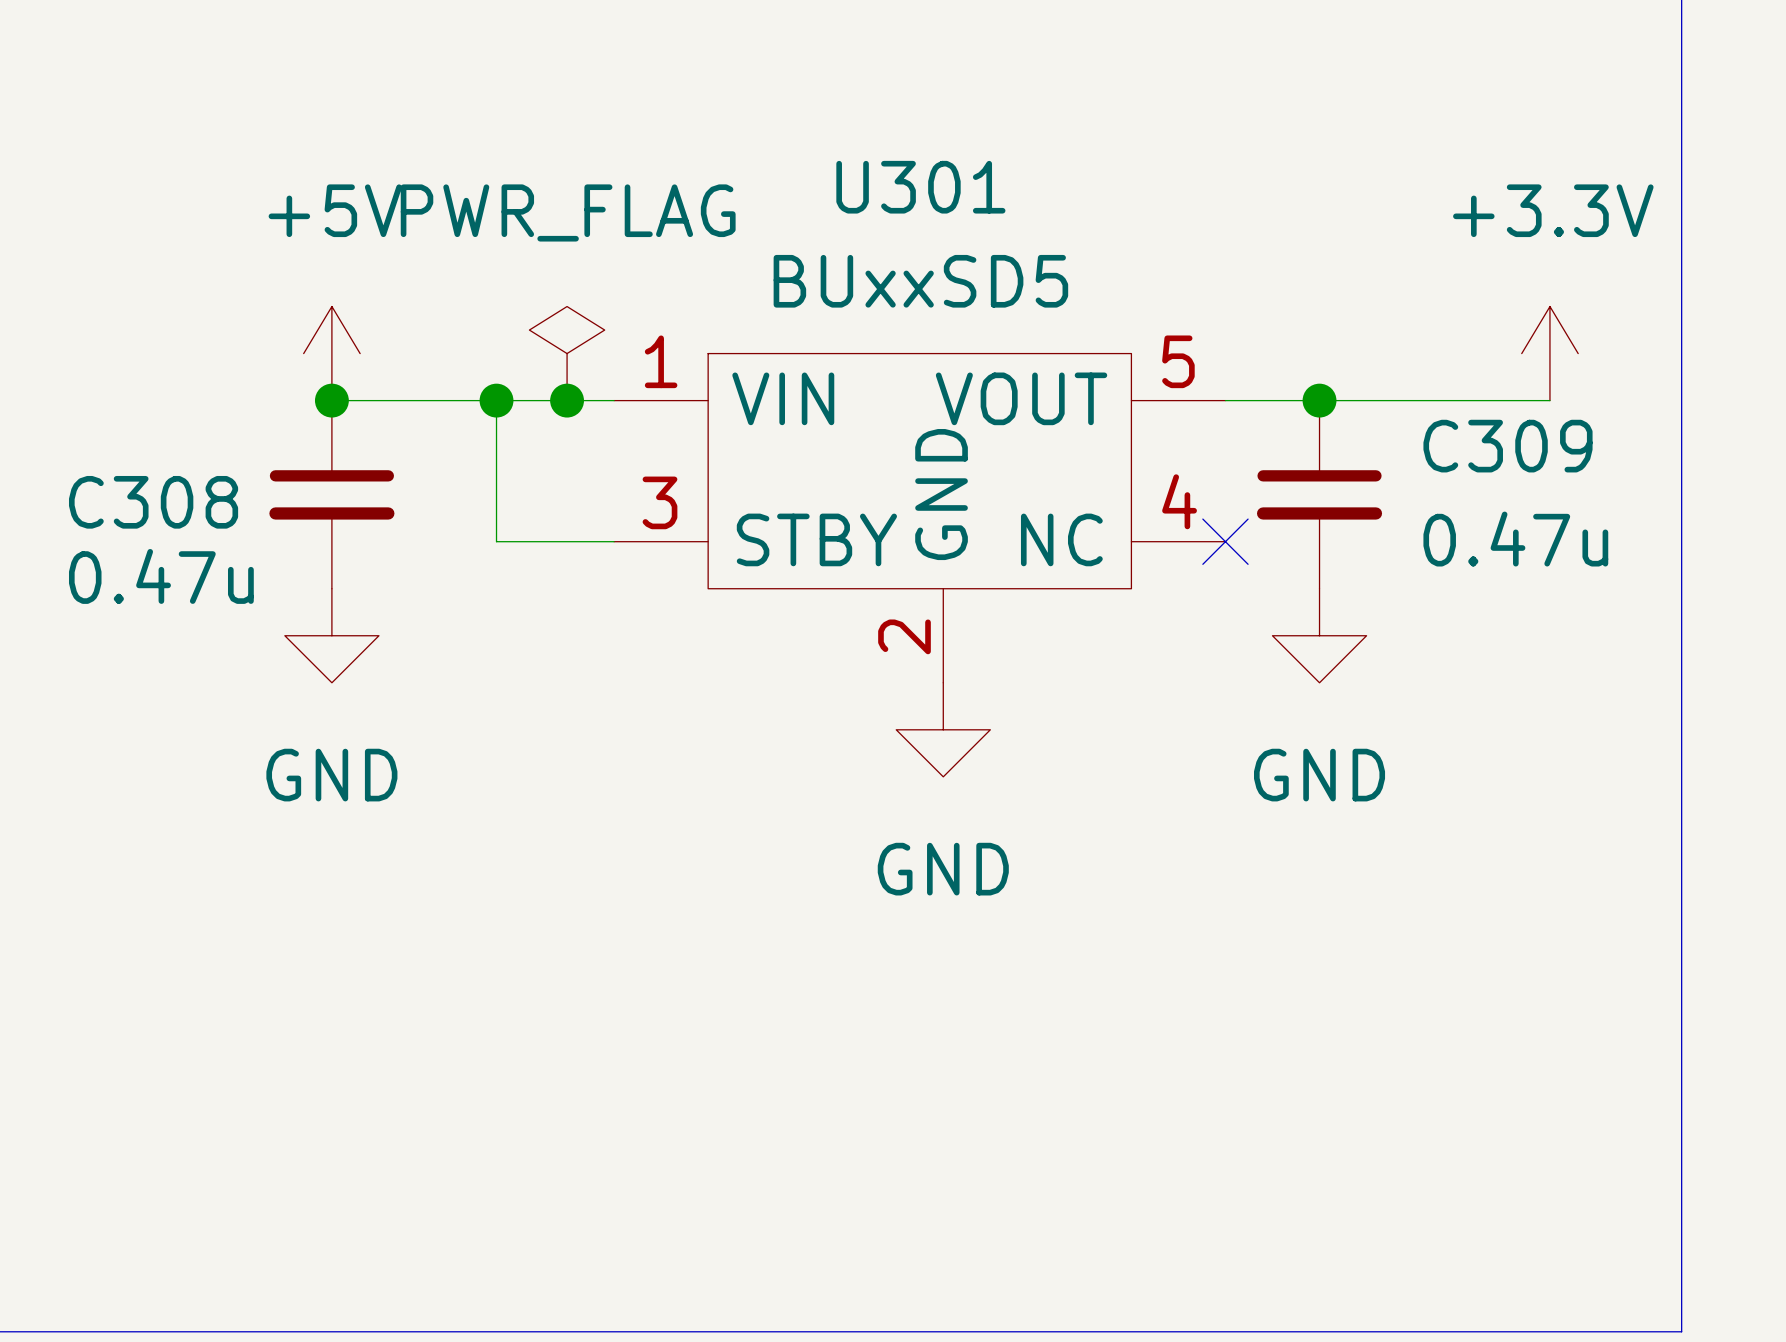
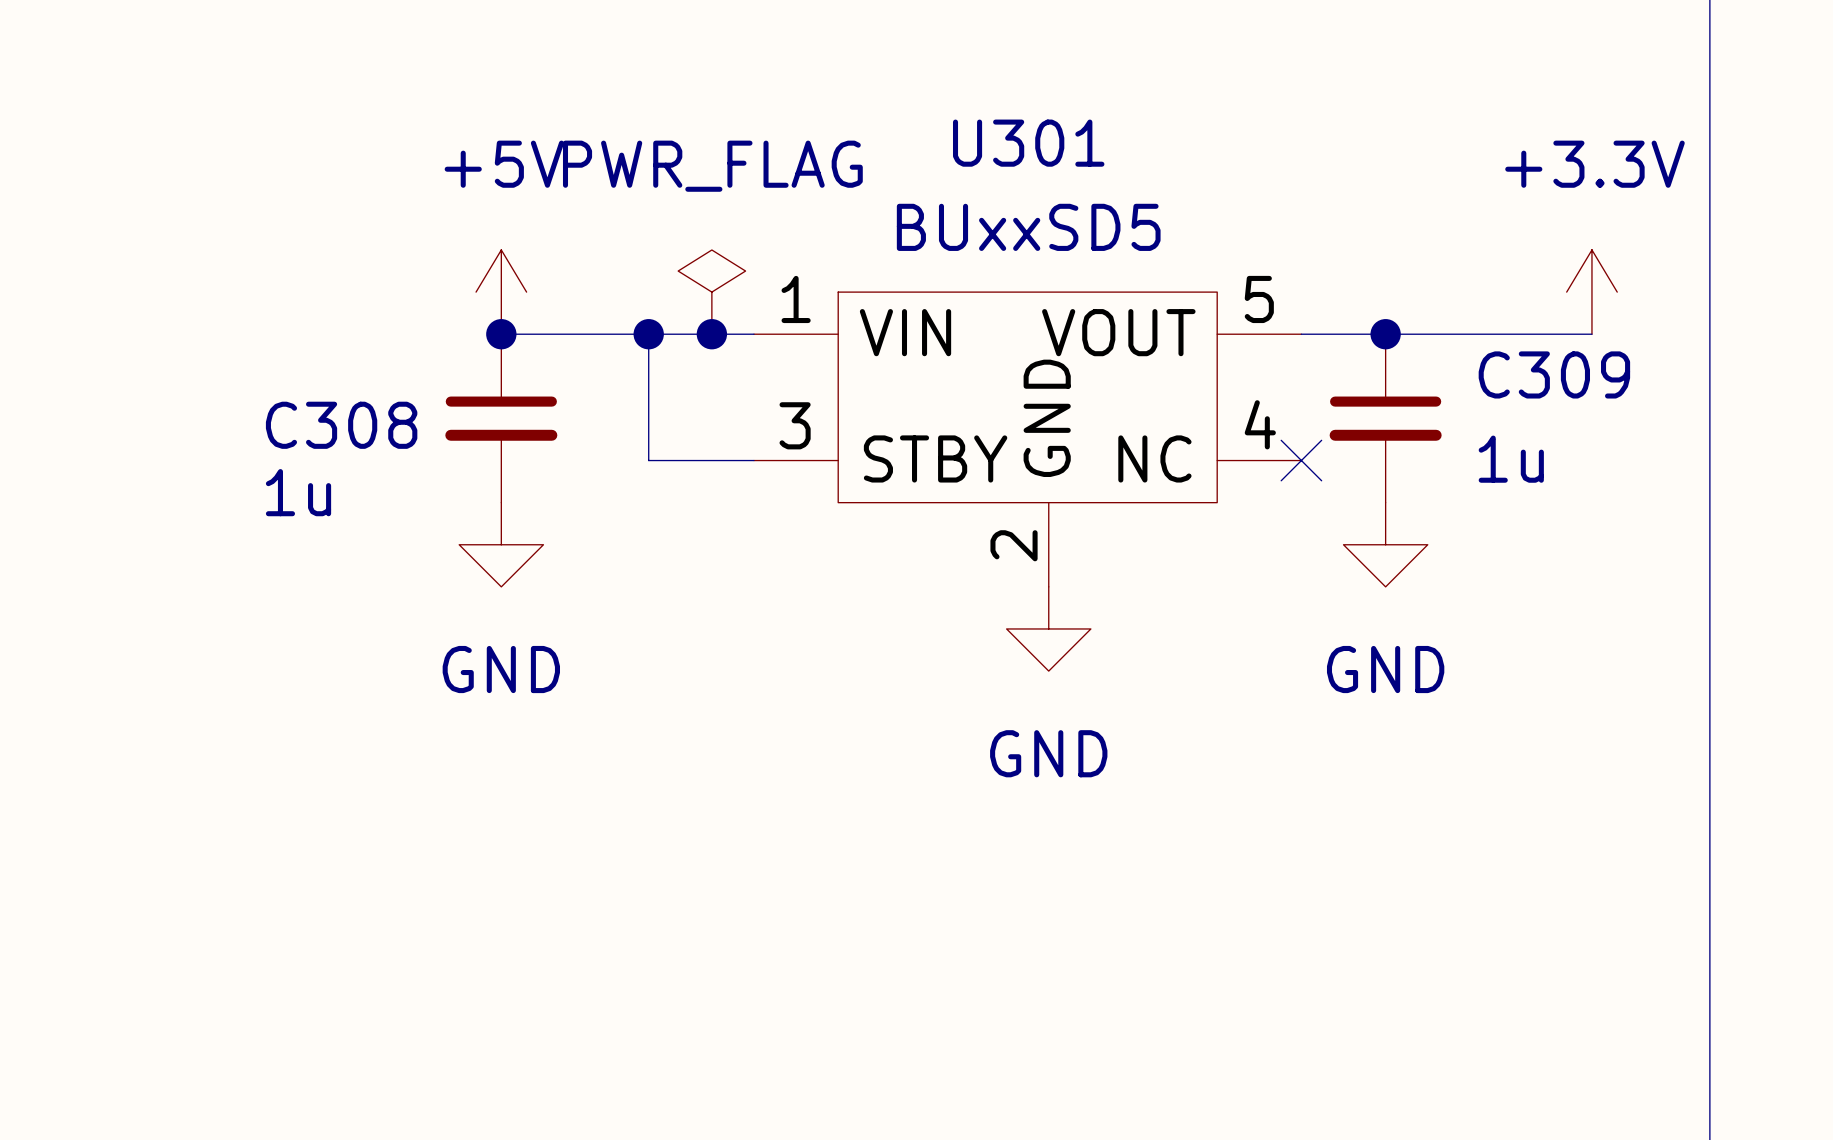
C309 value: 0.47u (1515, 539) -> 1u (1511, 459)
C308 value: 0.47u (161, 576) -> 1u (298, 492)

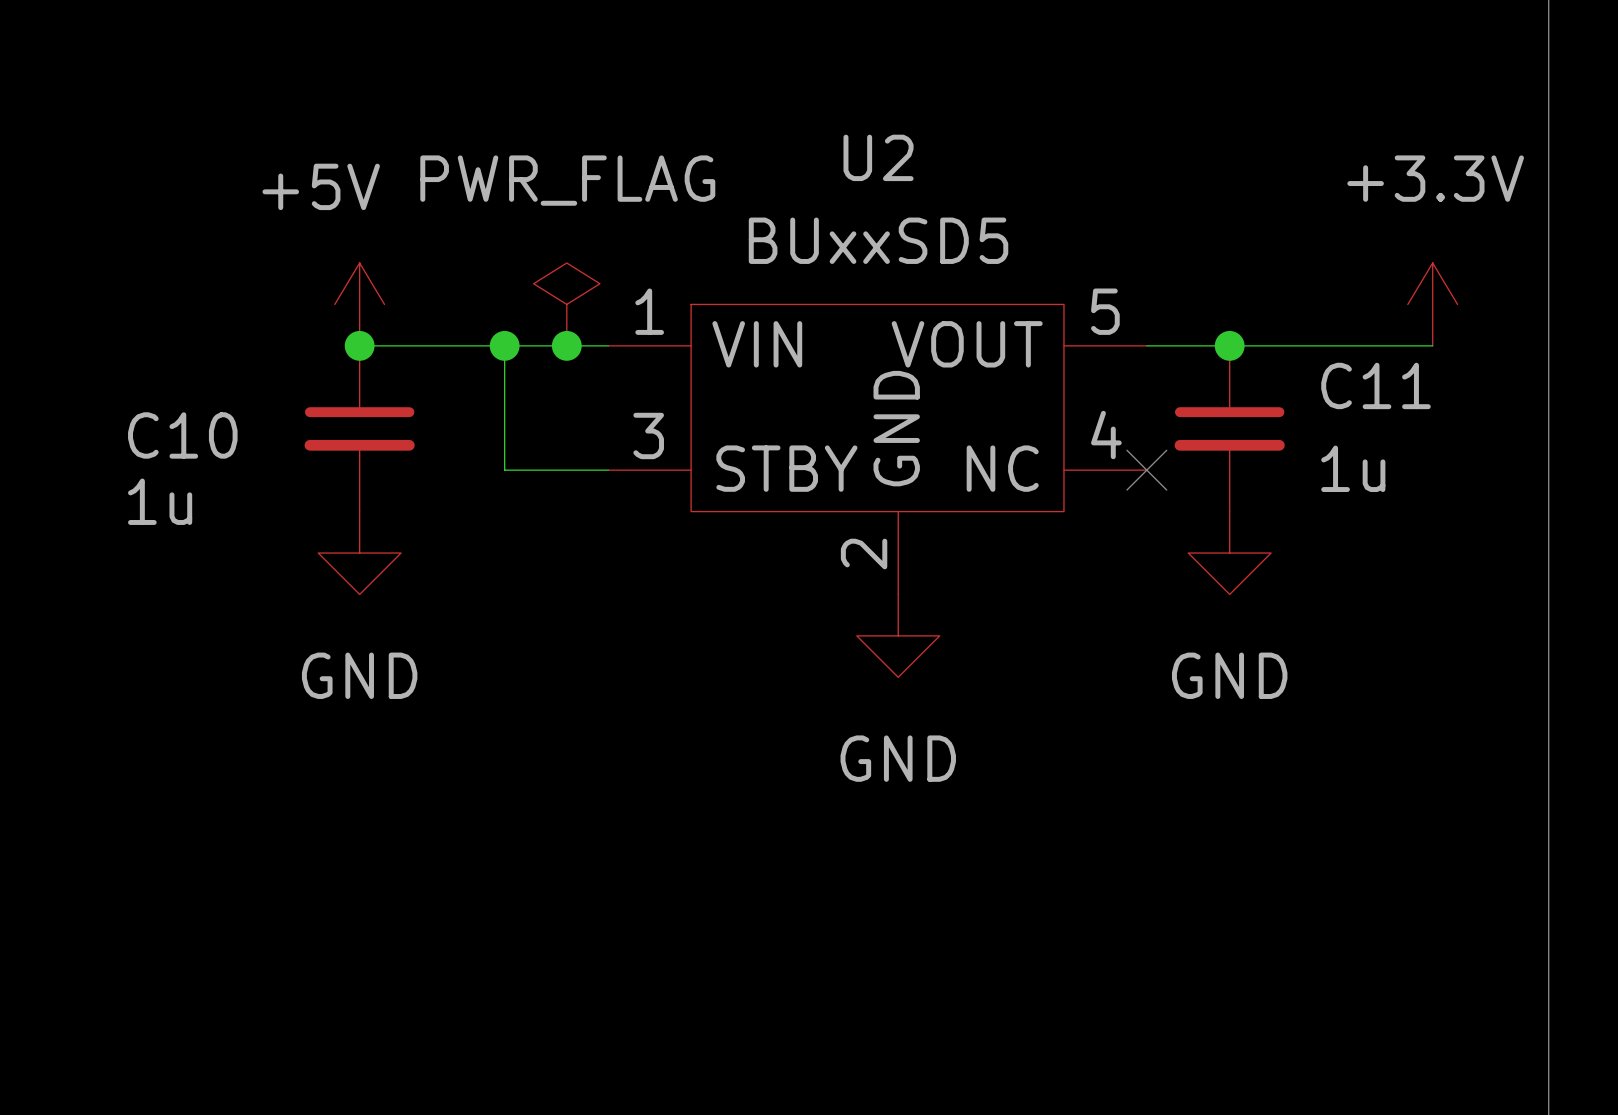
U301 name: U301 (1028, 143) -> U2 (878, 157)
power symbol text position: +5V (504, 164) -> +5V (321, 186)
C309 name: C309 (1554, 374) -> C11 (1375, 385)
C308 name: C308 (341, 425) -> C10 (182, 435)

